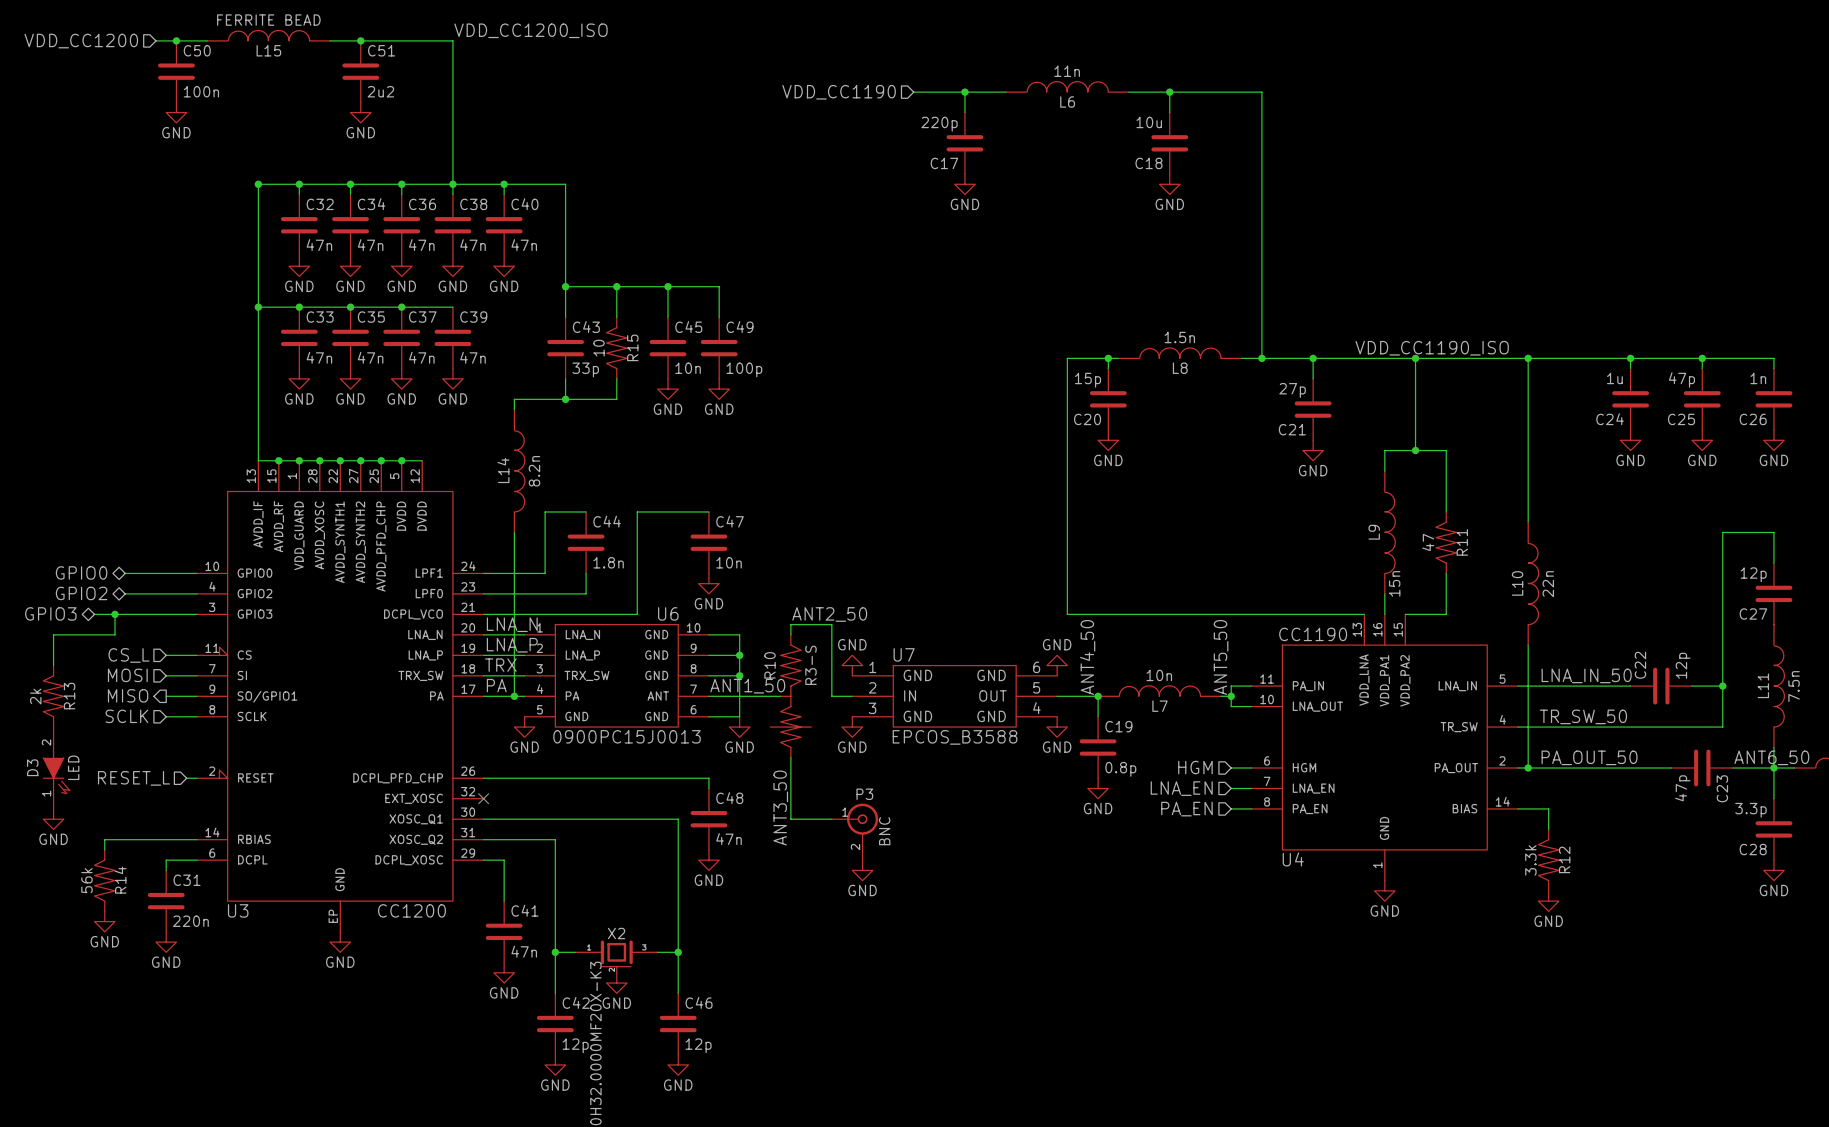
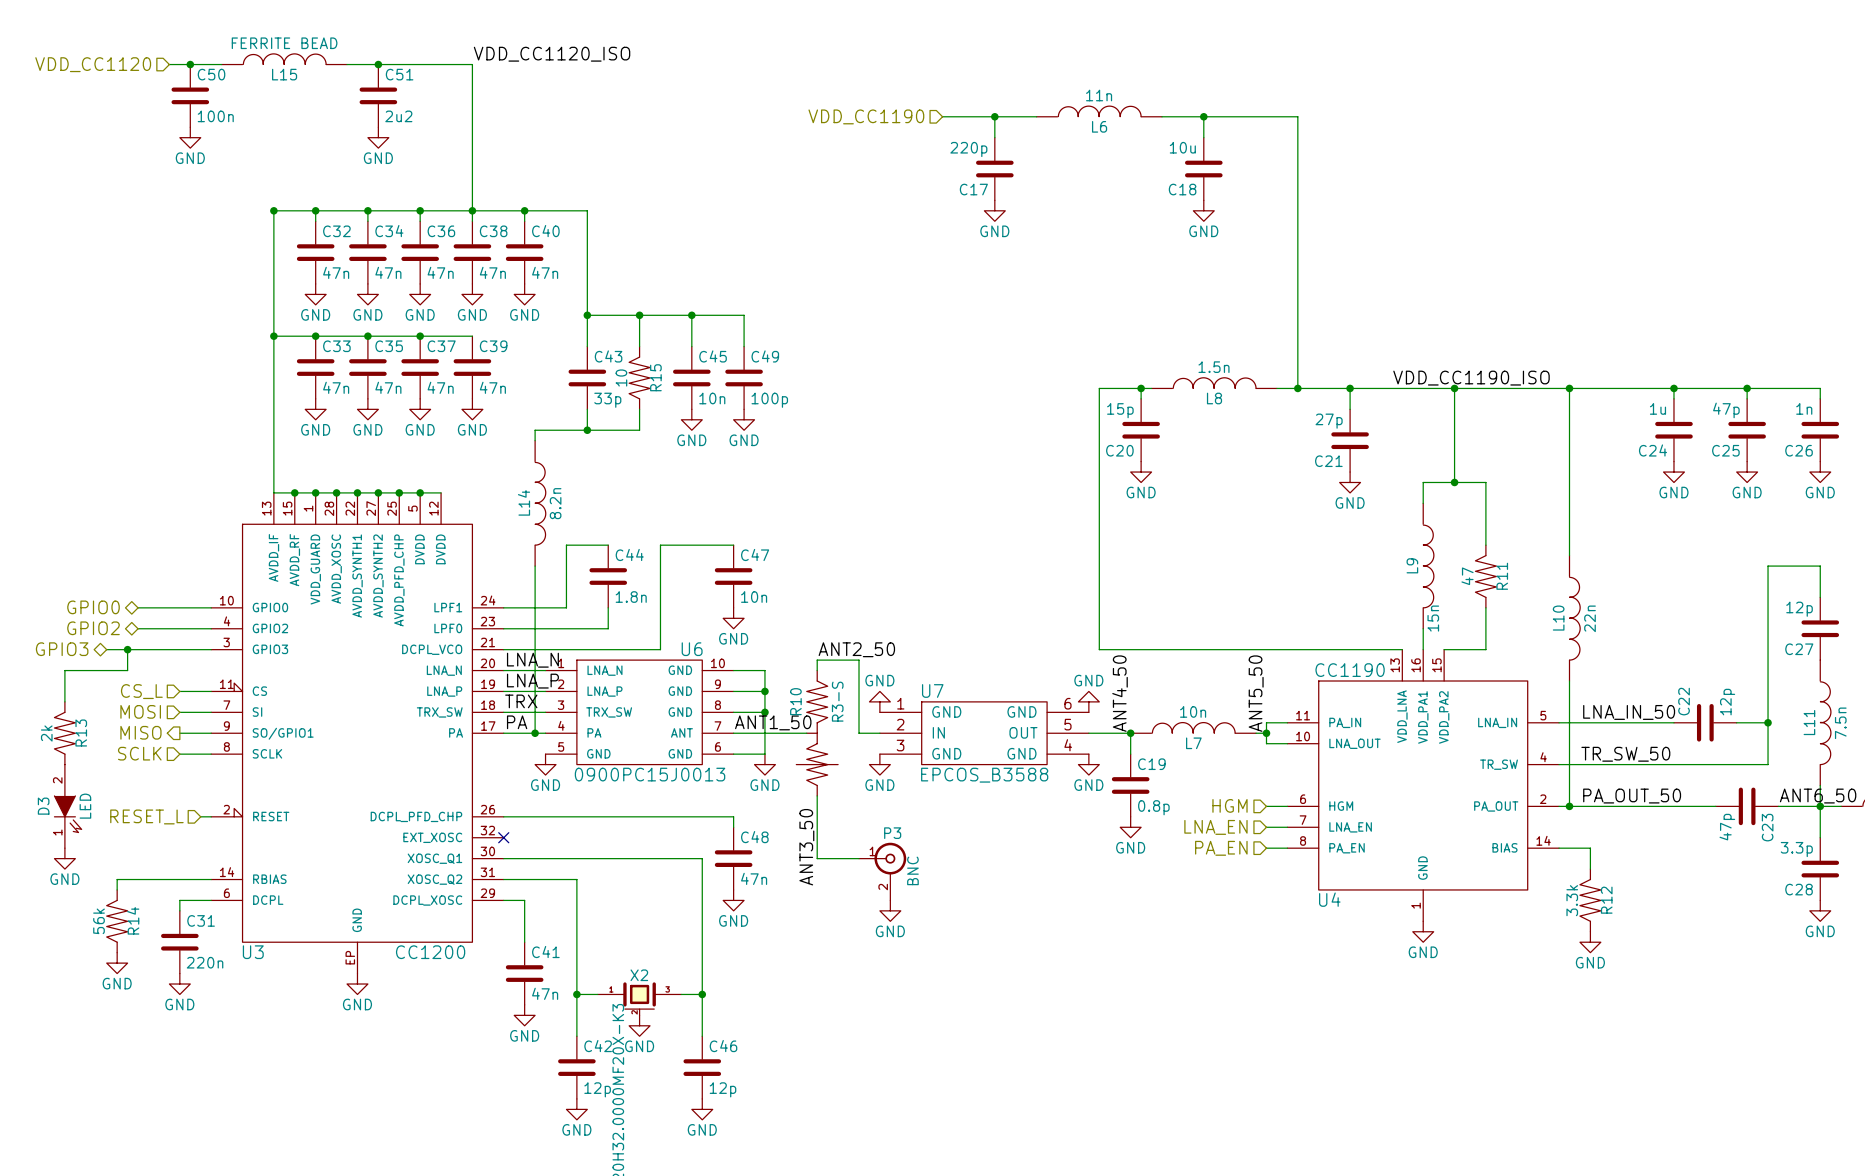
label: VDD_CC1200_ISO (530, 30) -> VDD_CC1120_ISO (552, 54)
hierarchical label: VDD_CC1200 (81, 41) -> VDD_CC1120 (93, 64)

